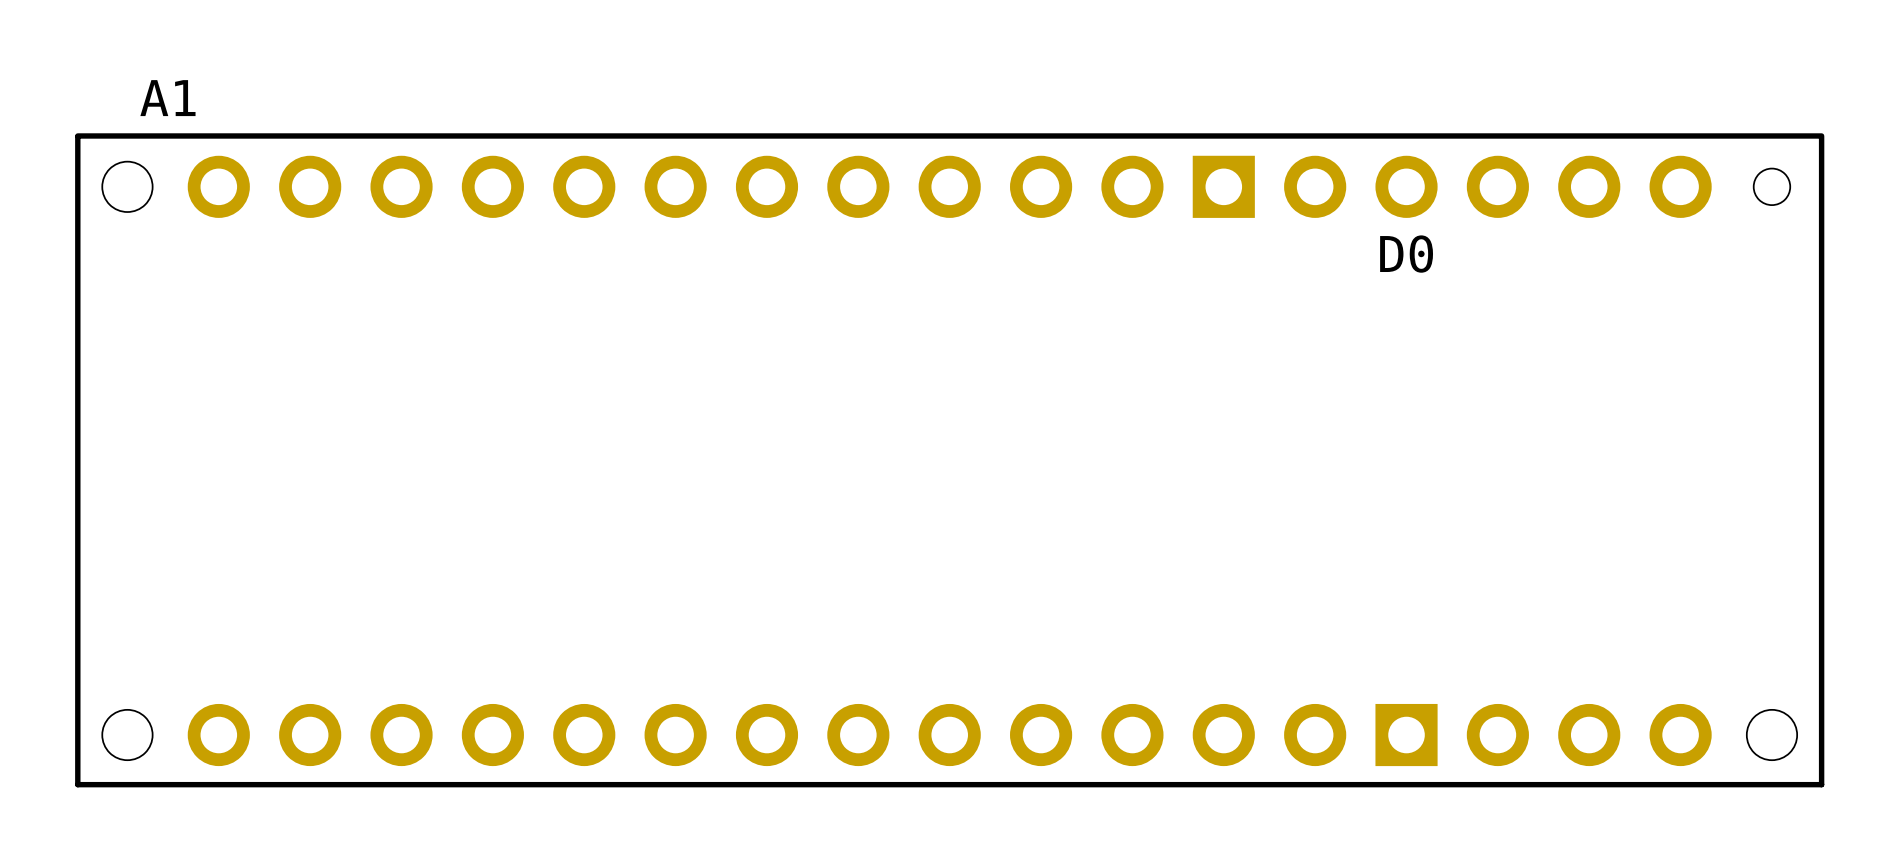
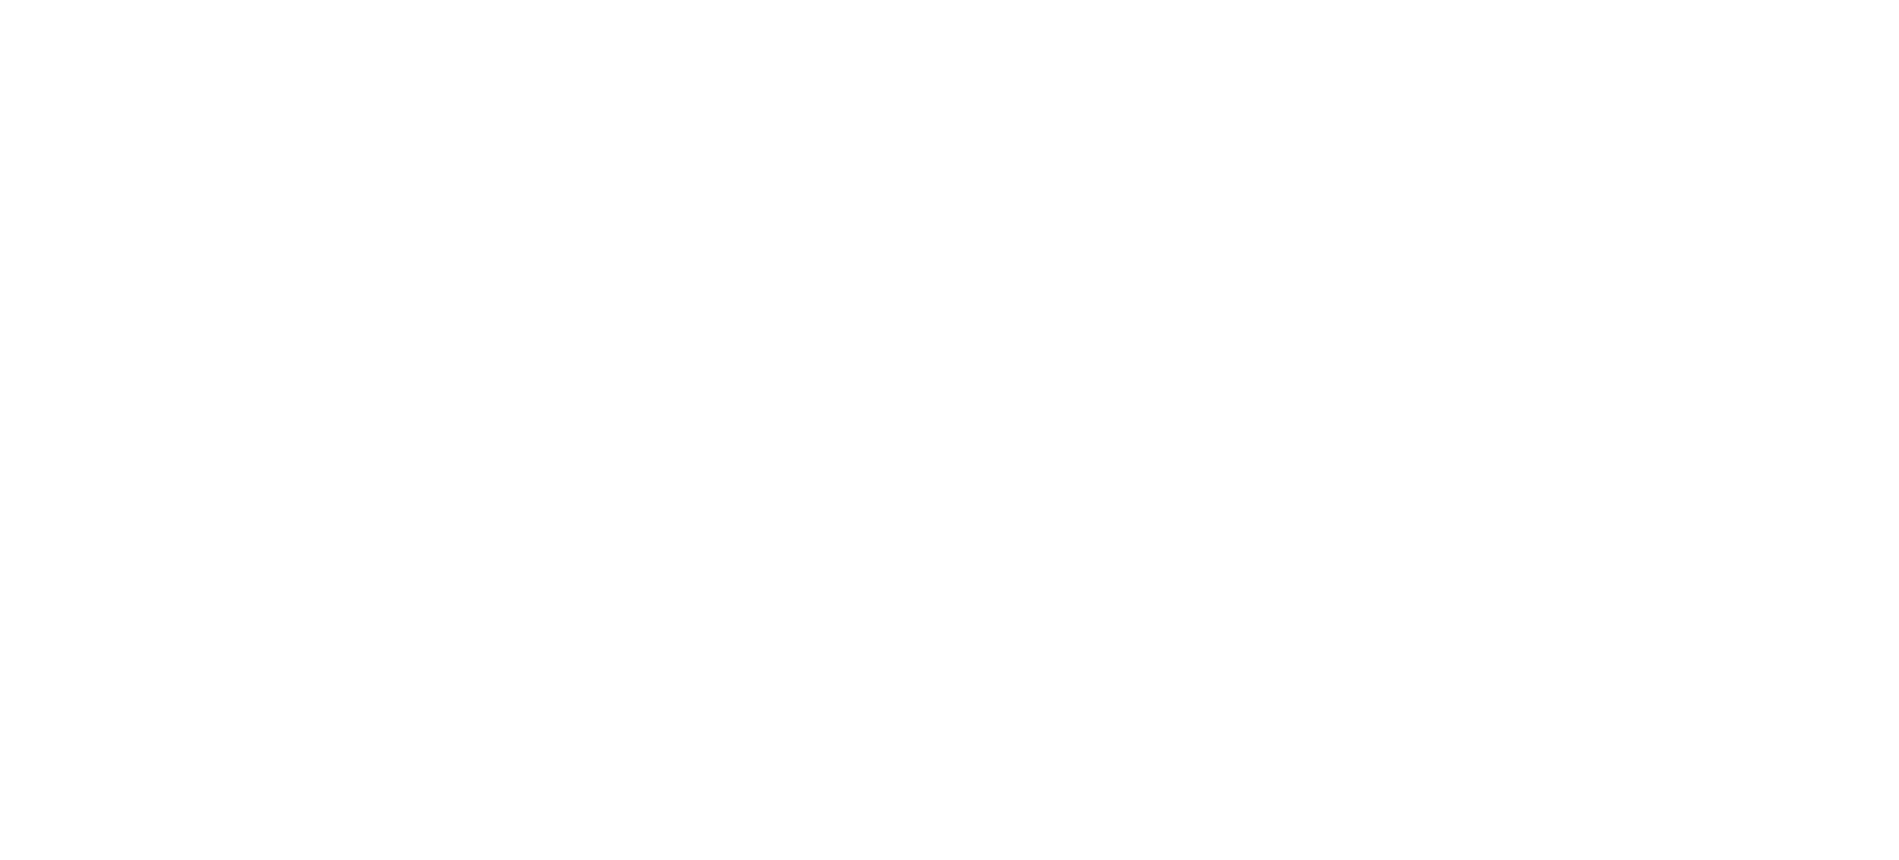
A1: (949, 460) -> none

